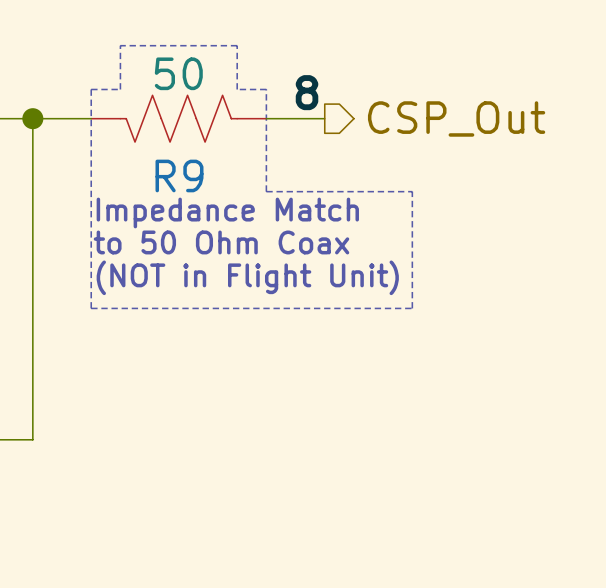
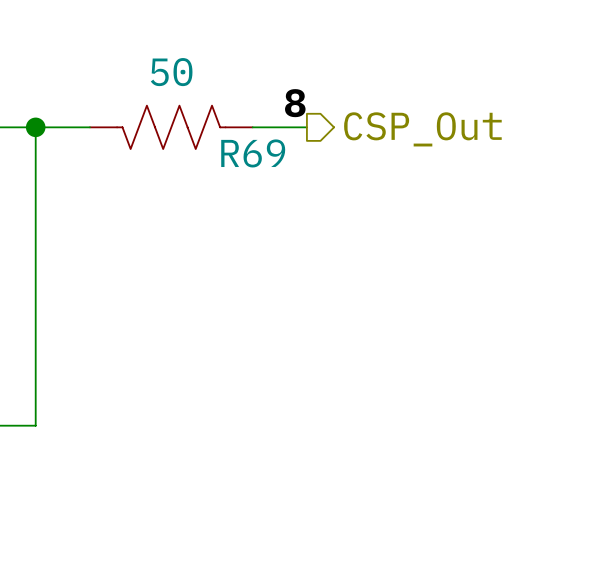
line: (120, 45) (237, 45) (237, 89) (266, 89) (266, 191) (412, 191) (412, 308) (91, 308) (91, 89) (120, 89) (120, 45) -> none
R9 value position: 50 (178, 73) -> 50 (171, 72)
R9 name: R9 (179, 175) -> R69 (253, 153)
text: Impedance Match (227, 212) -> none
text: to 50 Ohm Coax (221, 242) -> none
text: (NOT in Flight Unit) (247, 277) -> none

